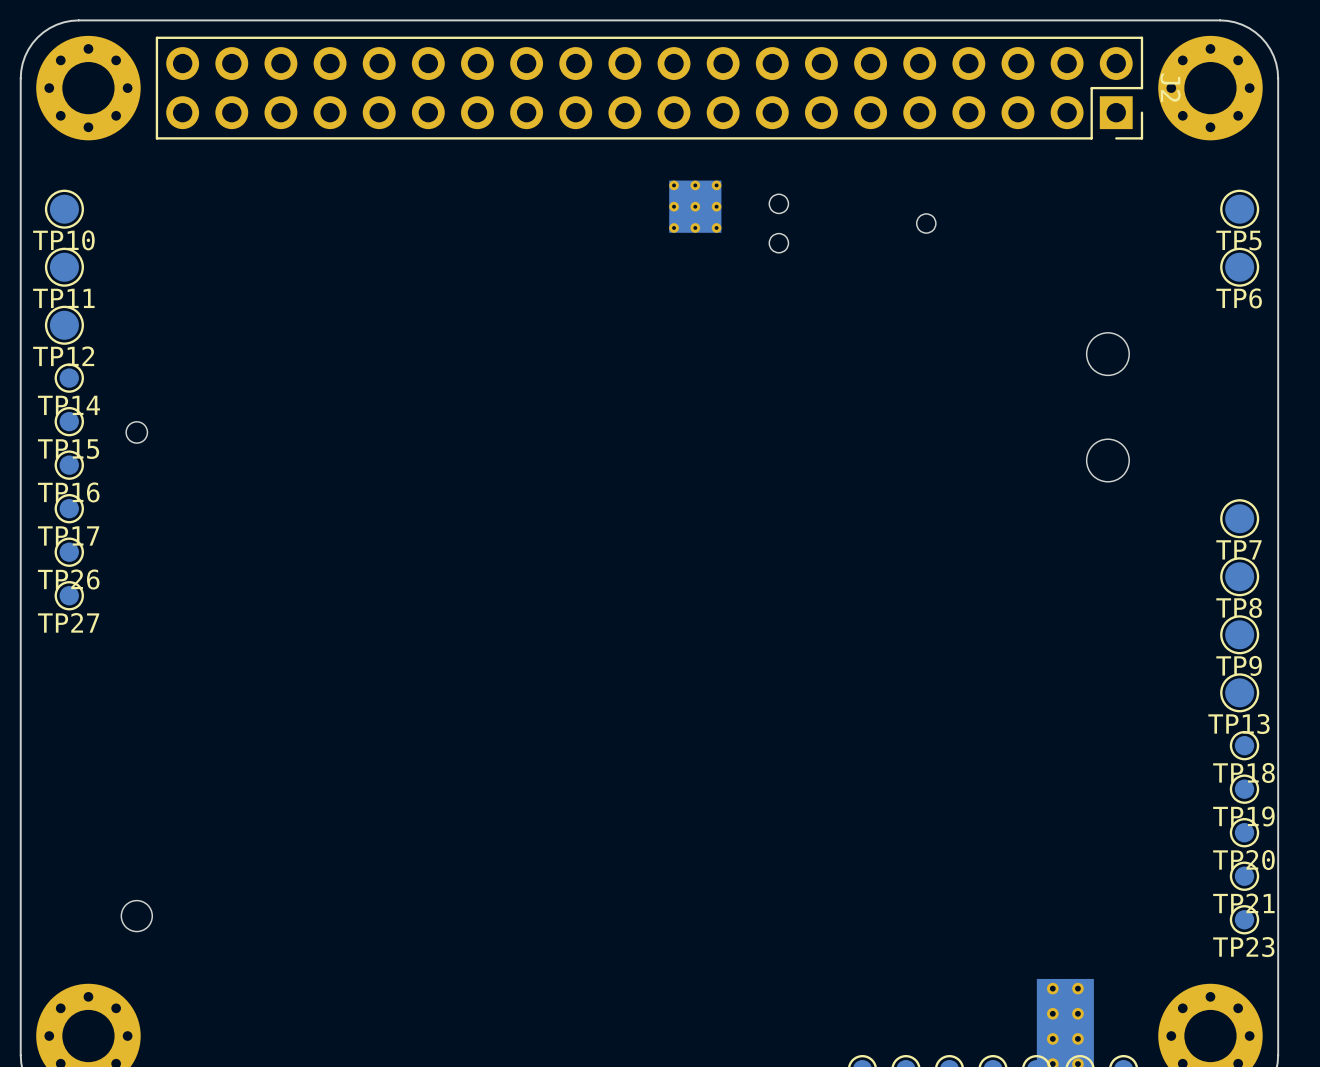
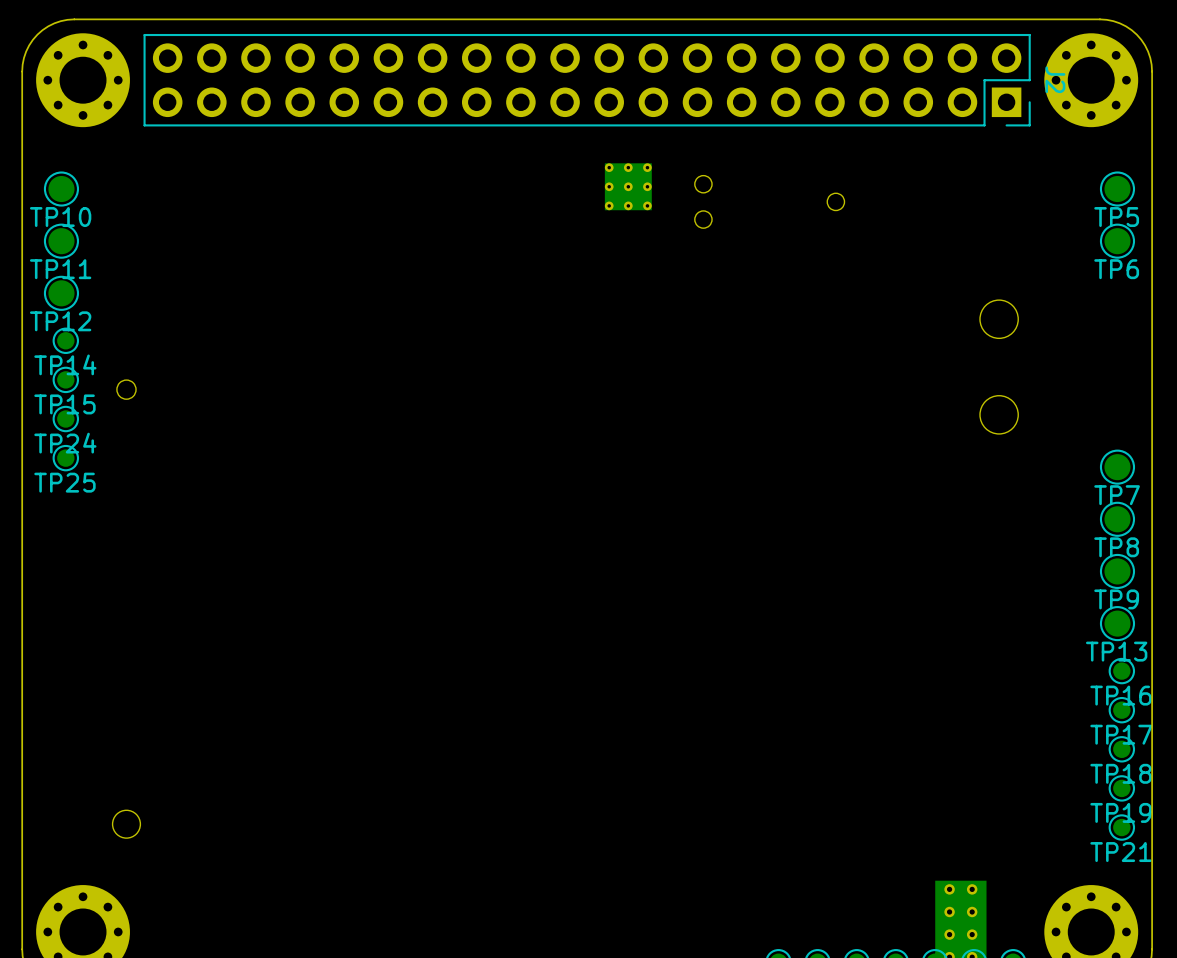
TP16 name: TP16 (68, 492) -> TP24 (65, 443)
TP17 name: TP17 (68, 535) -> TP25 (64, 482)
TP26: (69, 552) -> none
TP27: (69, 595) -> none
TP18 name: TP18 (1243, 772) -> TP16 (1121, 695)
TP19 name: TP19 (1243, 816) -> TP17 (1121, 734)
TP20 name: TP20 (1243, 860) -> TP18 (1121, 773)
TP21 name: TP21 (1243, 903) -> TP19 (1121, 812)
TP23 name: TP23 (1243, 947) -> TP21 (1121, 852)

